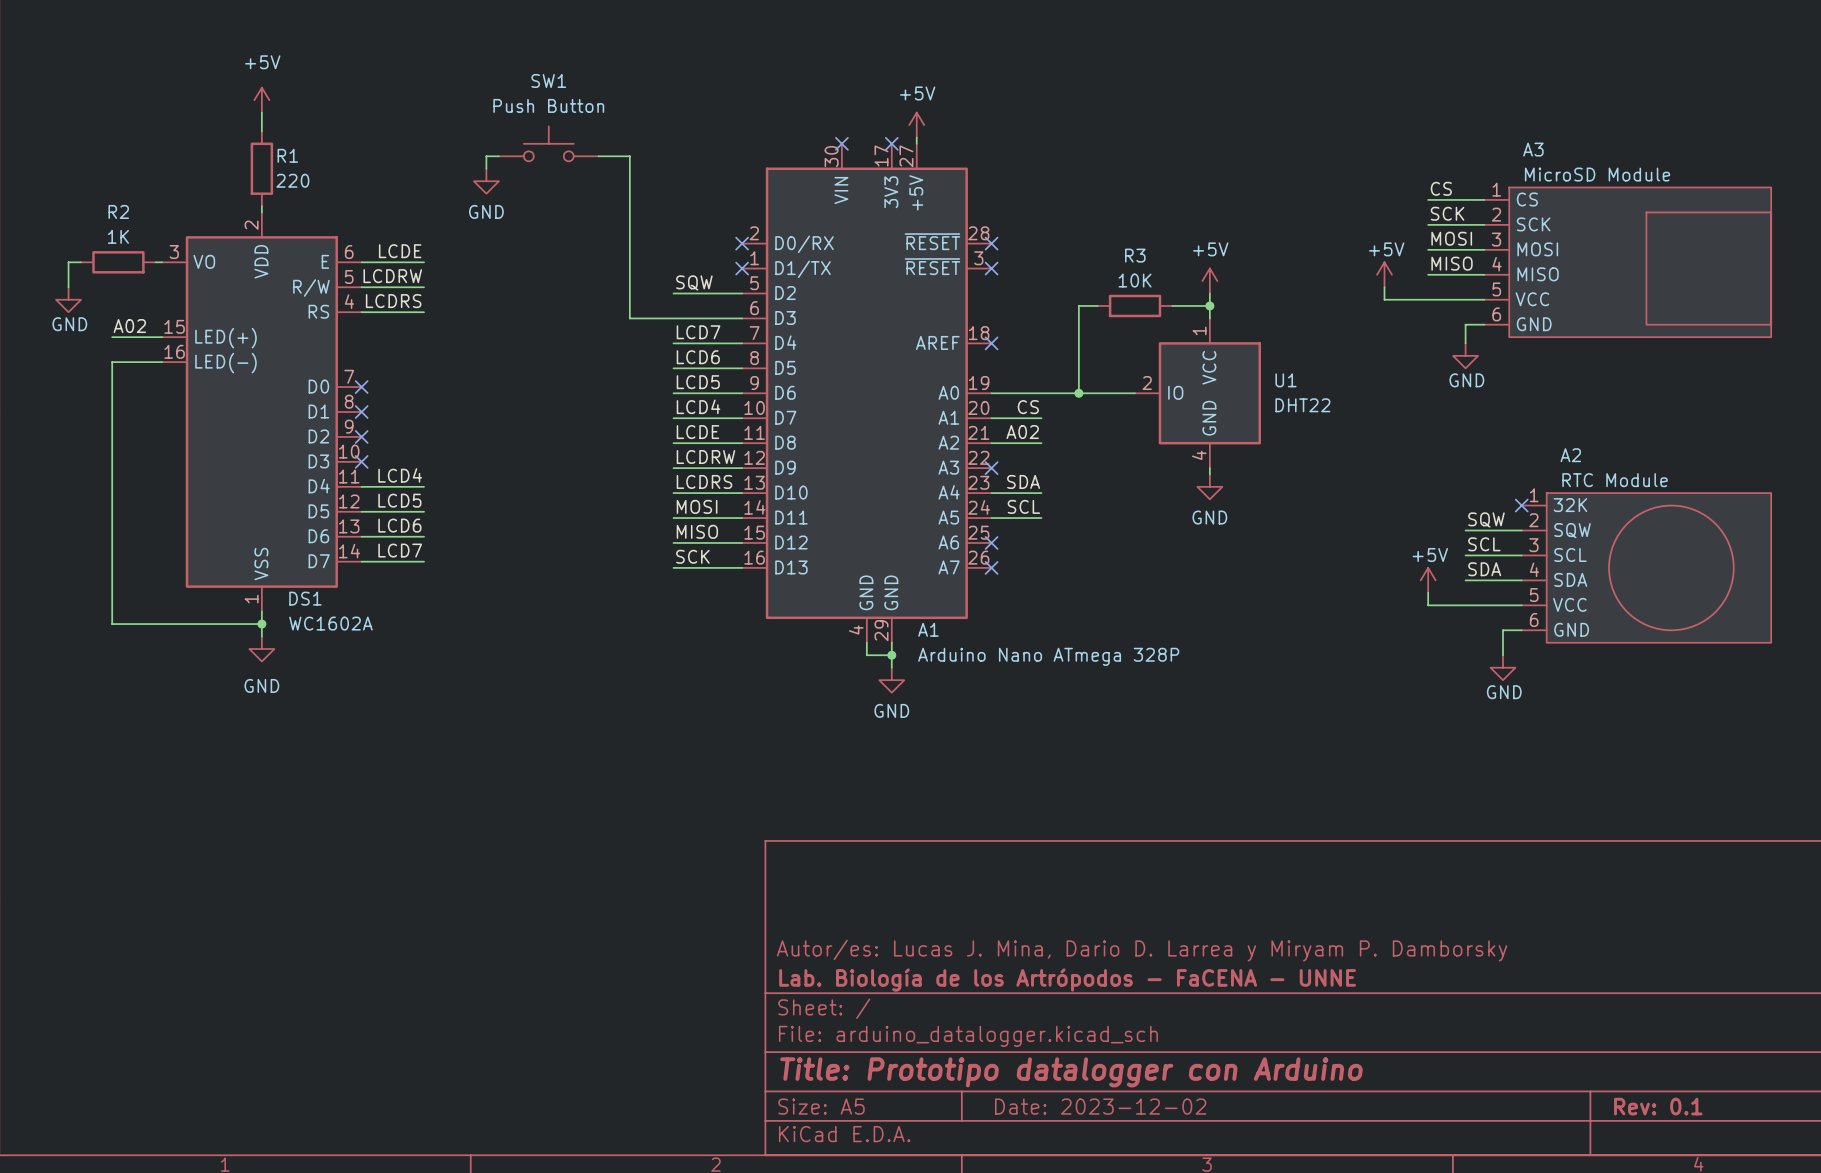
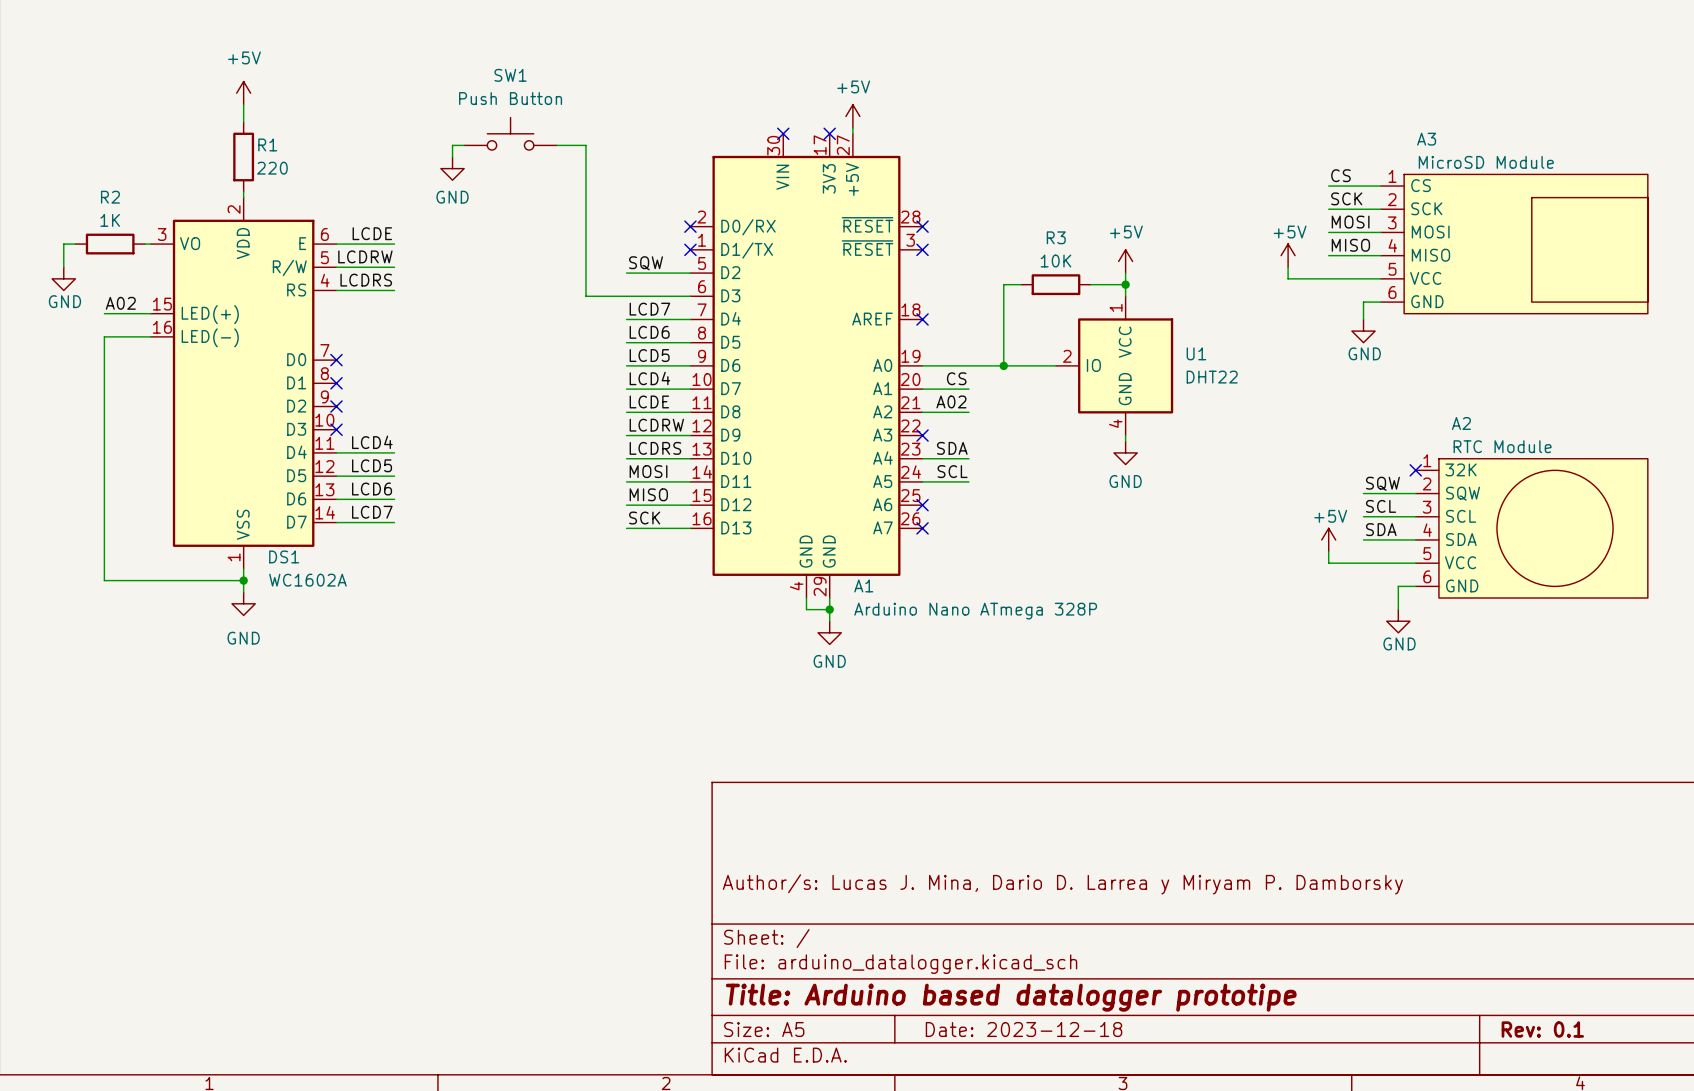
title block: Autor/es: Lucas J. Mina, Dario D. Larrea y Miryam P. Damborsky (1142, 950) -> Author/s: Lucas J. Mina, Dario D. Larrea y Miryam P. Damborsky (1062, 884)
title block: Lab. Biología de los Artrópodos - FaCENA - UNNE (1067, 980) -> none
title block: Title: Prototipo datalogger con Arduino (1071, 1072) -> Title: Arduino based datalogger prototipe (1011, 997)
title block: Date: 2023-12-02 (1100, 1106) -> Date: 2023-12-18 (1024, 1029)

